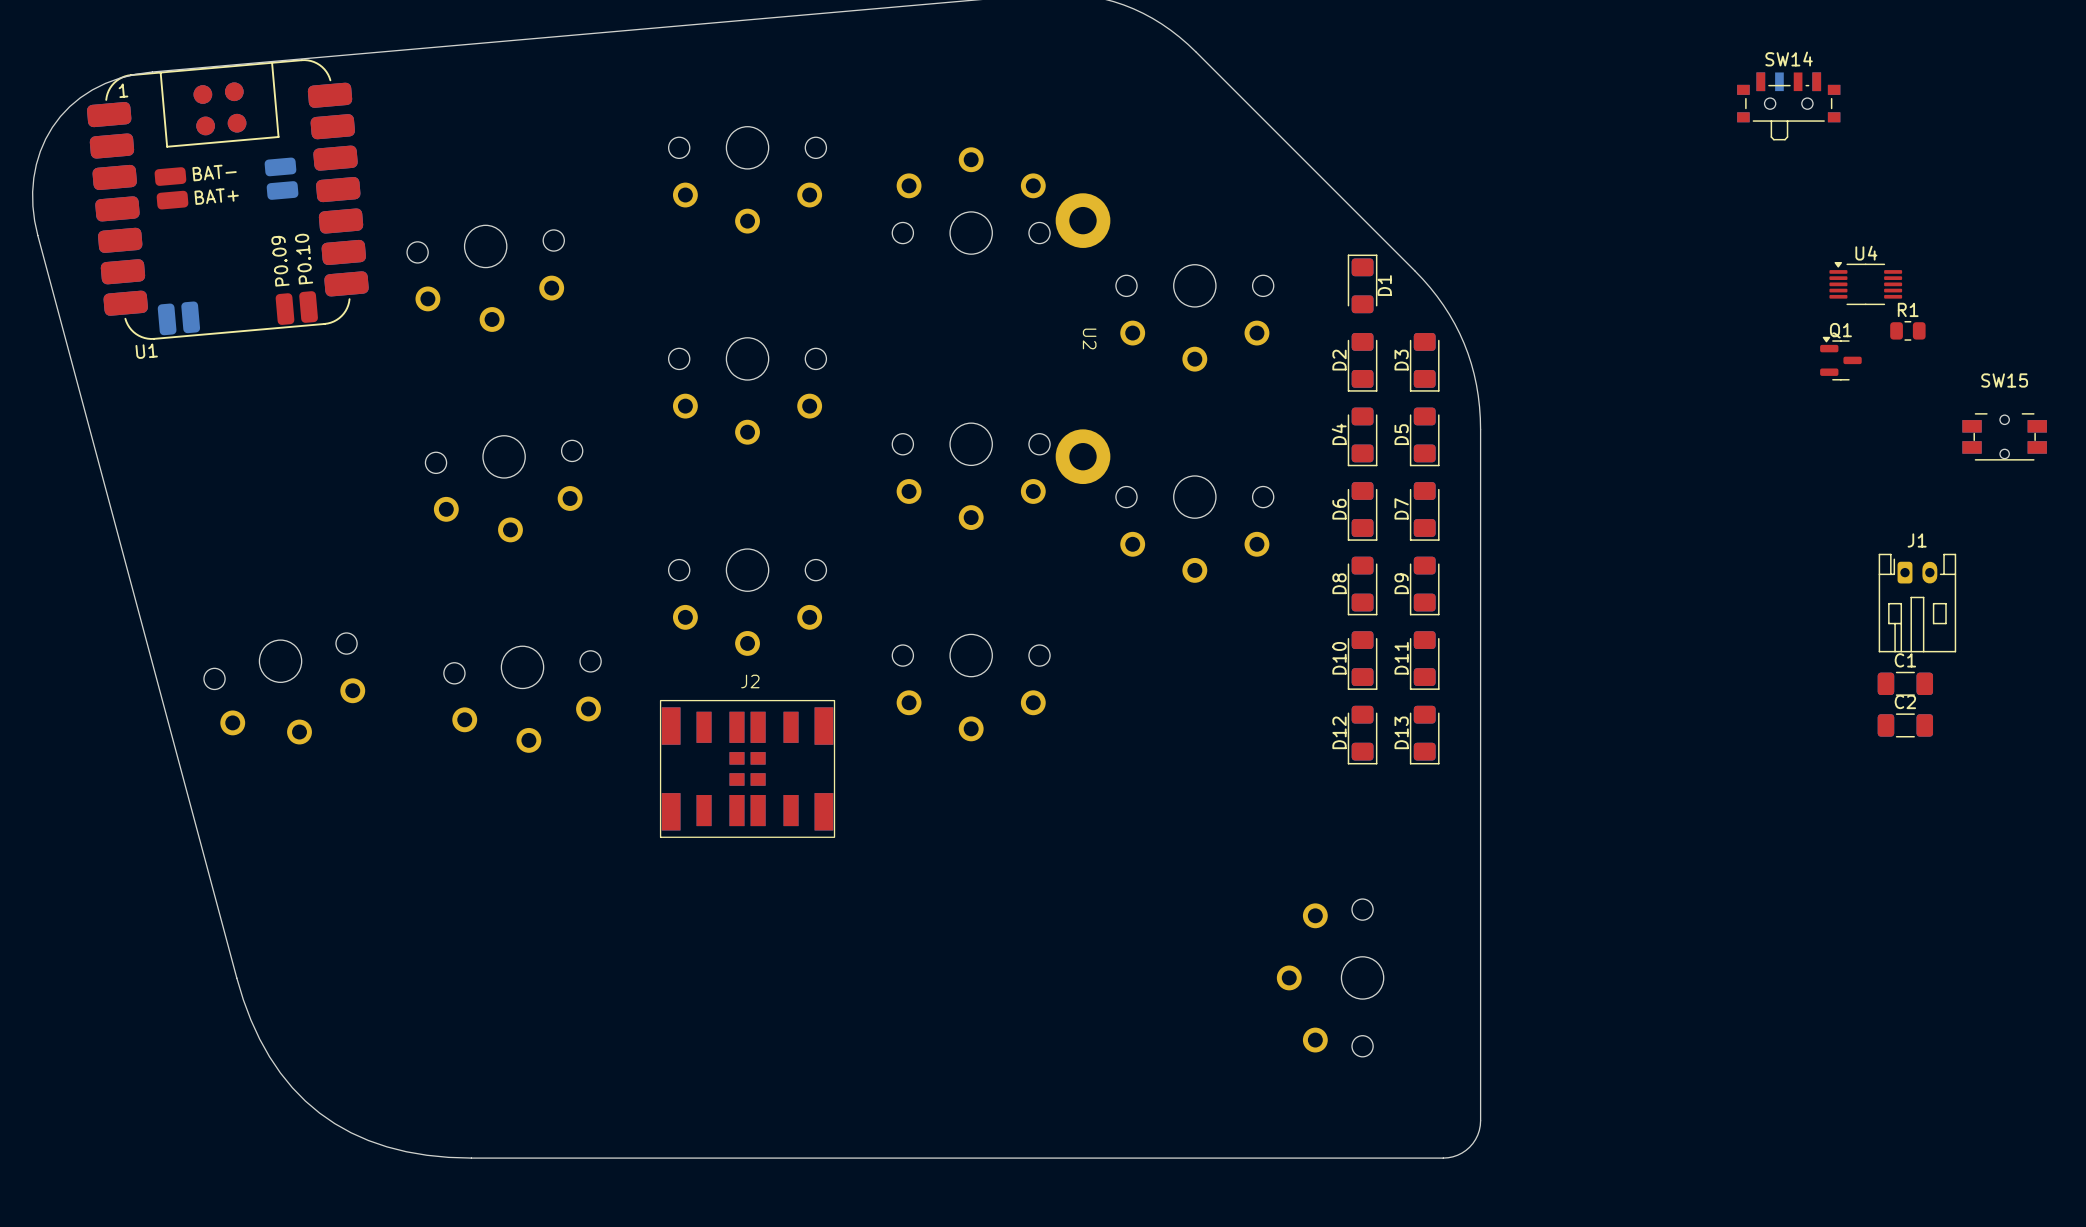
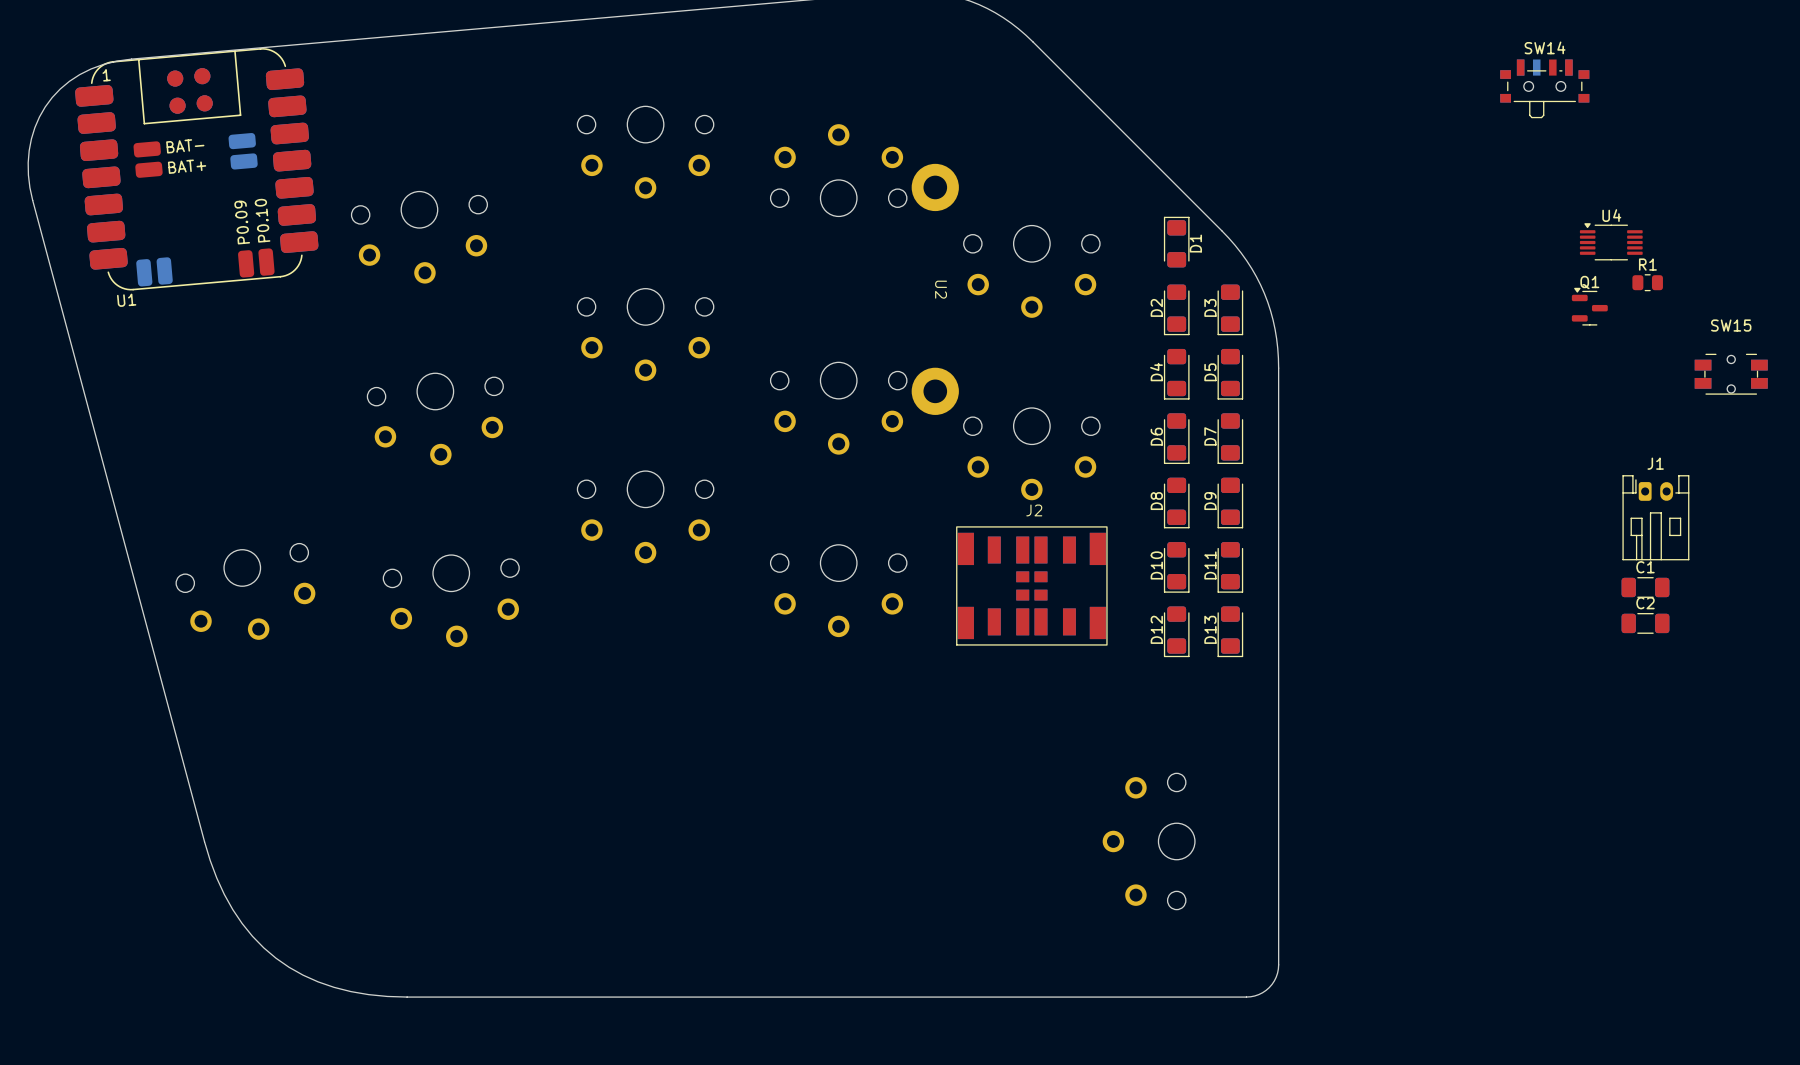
J2 position: (747, 768) -> (1031, 585)

